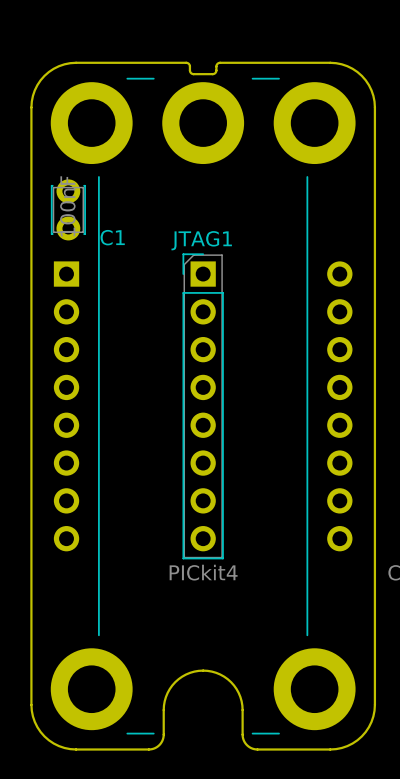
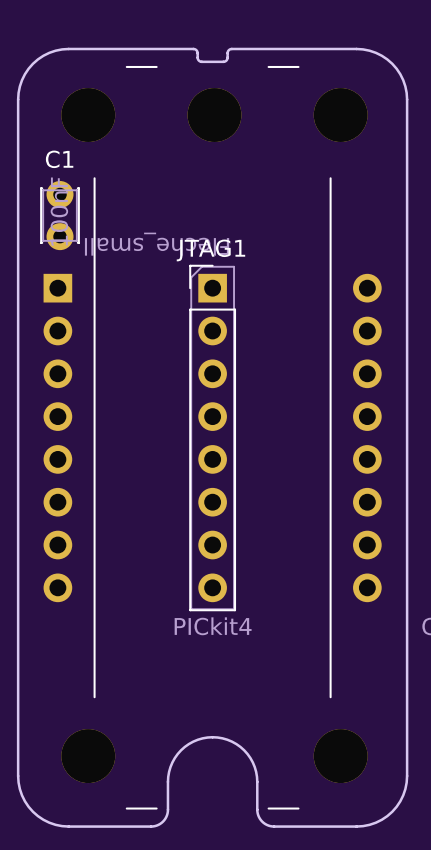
part footprint: [50, 82, 133, 165] -> [61, 88, 116, 142]
part footprint: [162, 82, 245, 165] -> [187, 88, 242, 142]
part footprint: [273, 82, 356, 165] -> [313, 88, 368, 142]
drawing: none -> [84, 232, 230, 256]
C1 name position: C1 (112, 237) -> C1 (59, 159)
part footprint: [50, 648, 133, 731] -> [61, 729, 116, 784]
part footprint: [273, 648, 356, 731] -> [313, 729, 368, 784]

